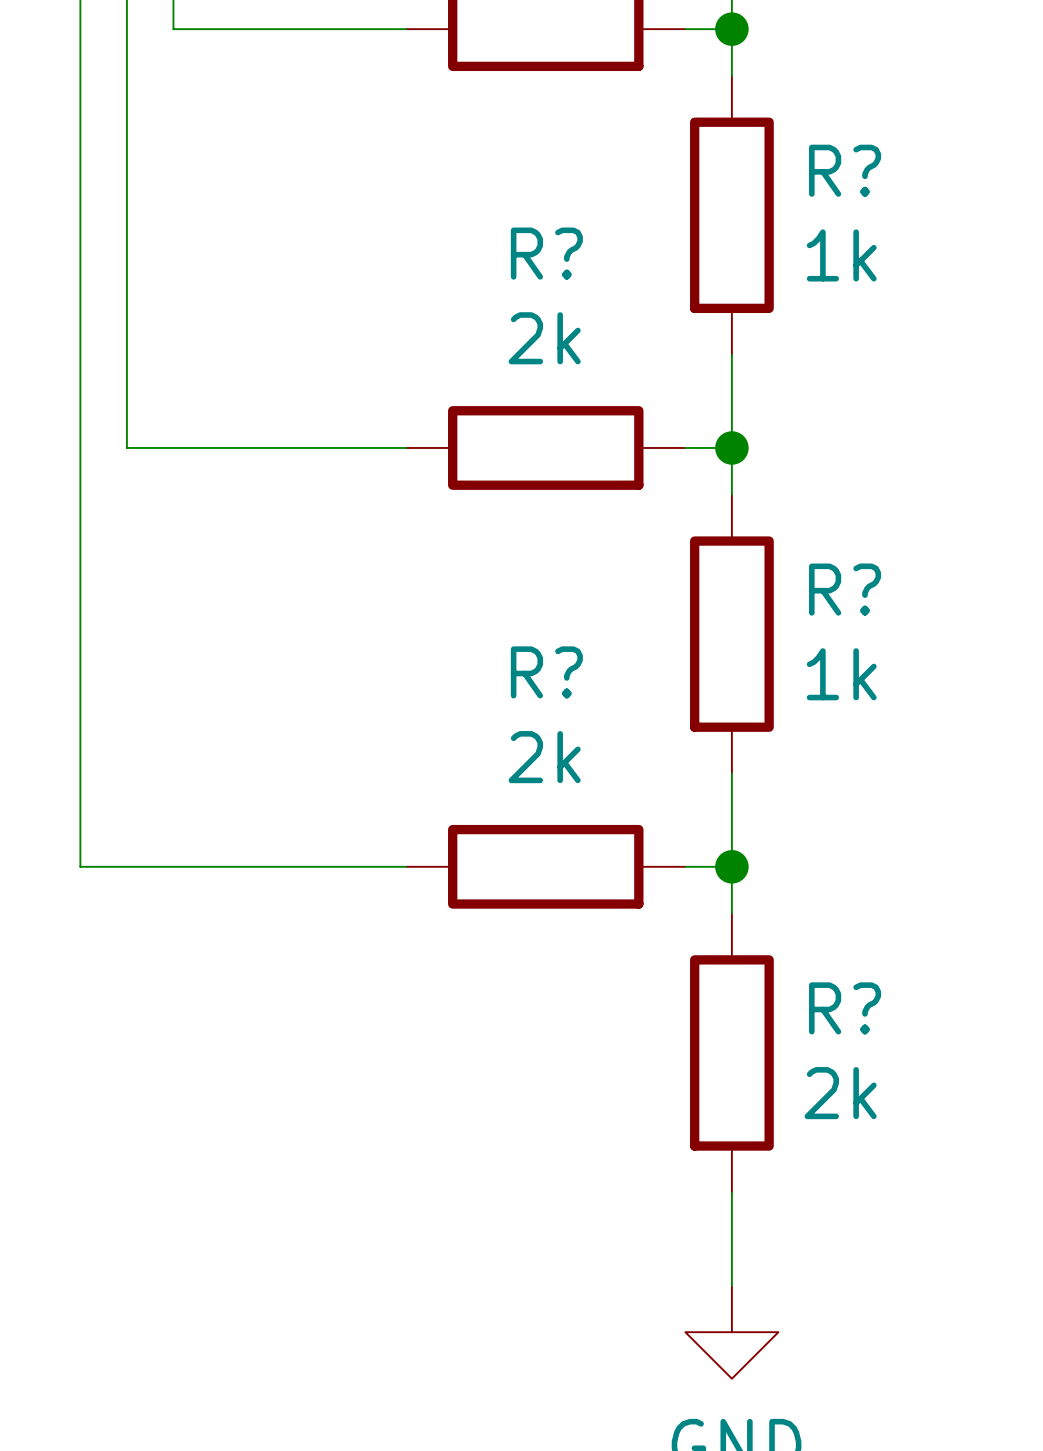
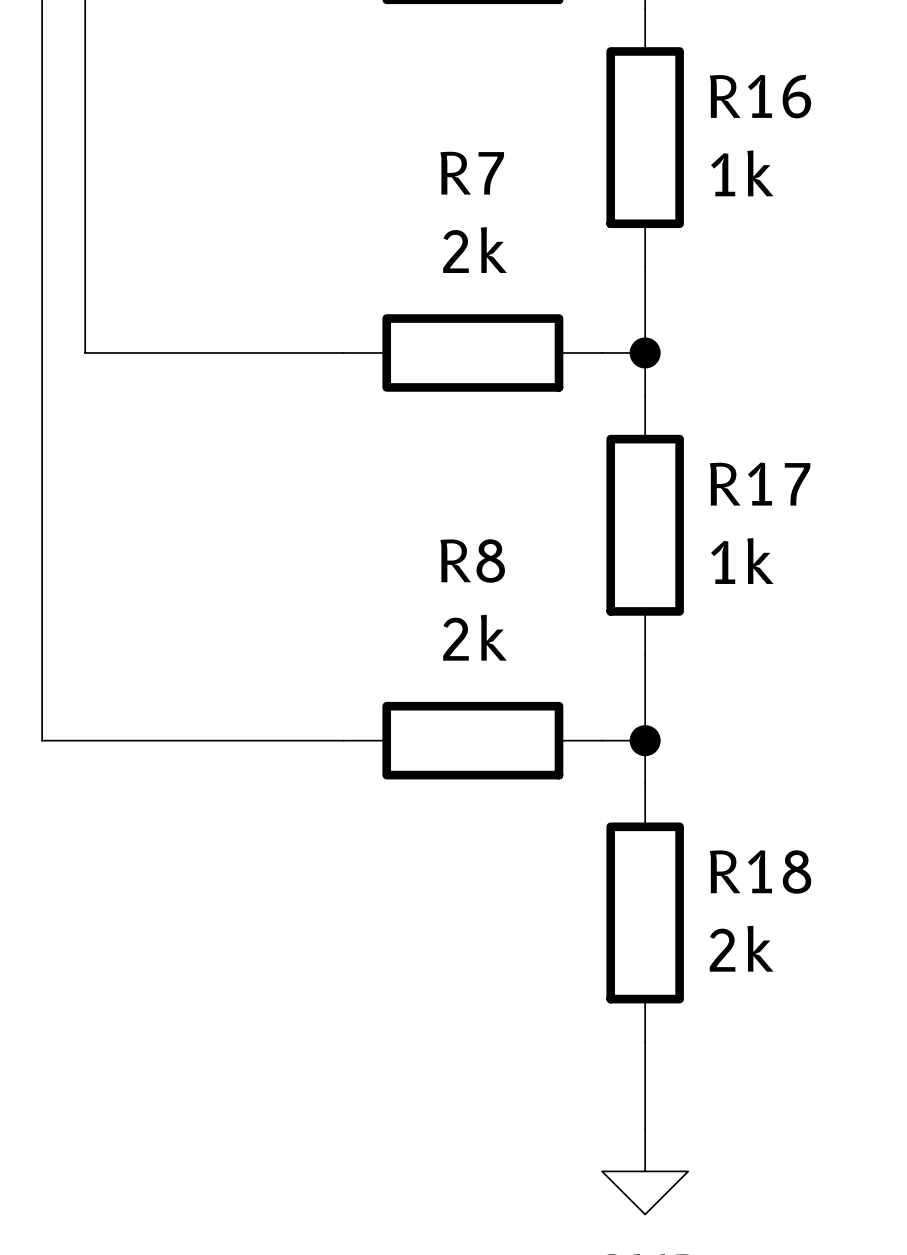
R? name: R? (845, 170) -> R16 (760, 96)
R? name: R? (546, 253) -> R7 (472, 173)
R? name: R? (845, 589) -> R17 (760, 484)
R? name: R? (546, 672) -> R8 (472, 561)
R? name: R? (845, 1008) -> R18 (760, 871)

